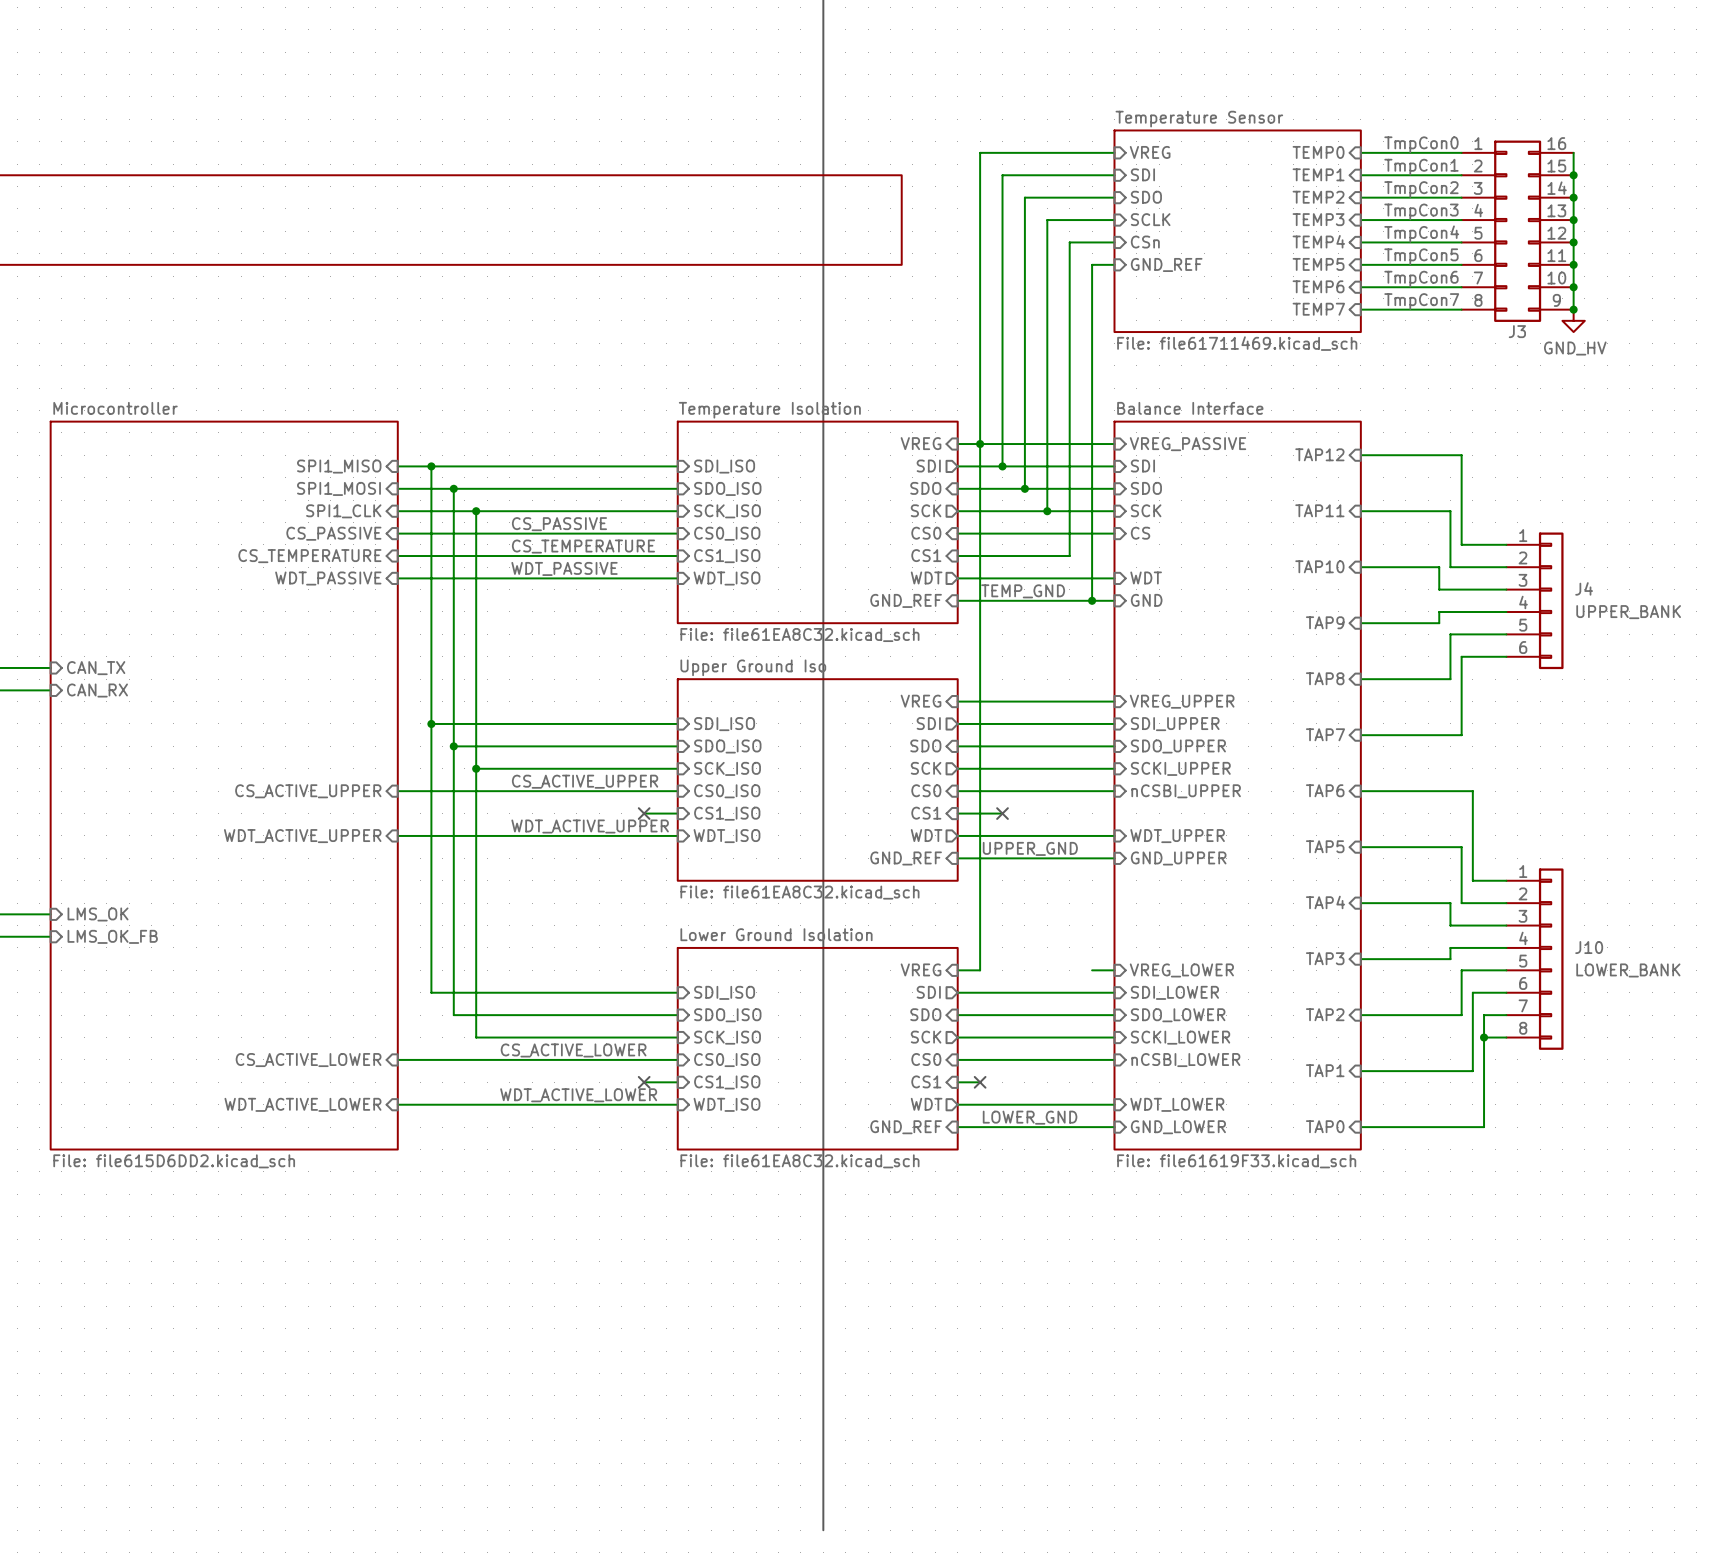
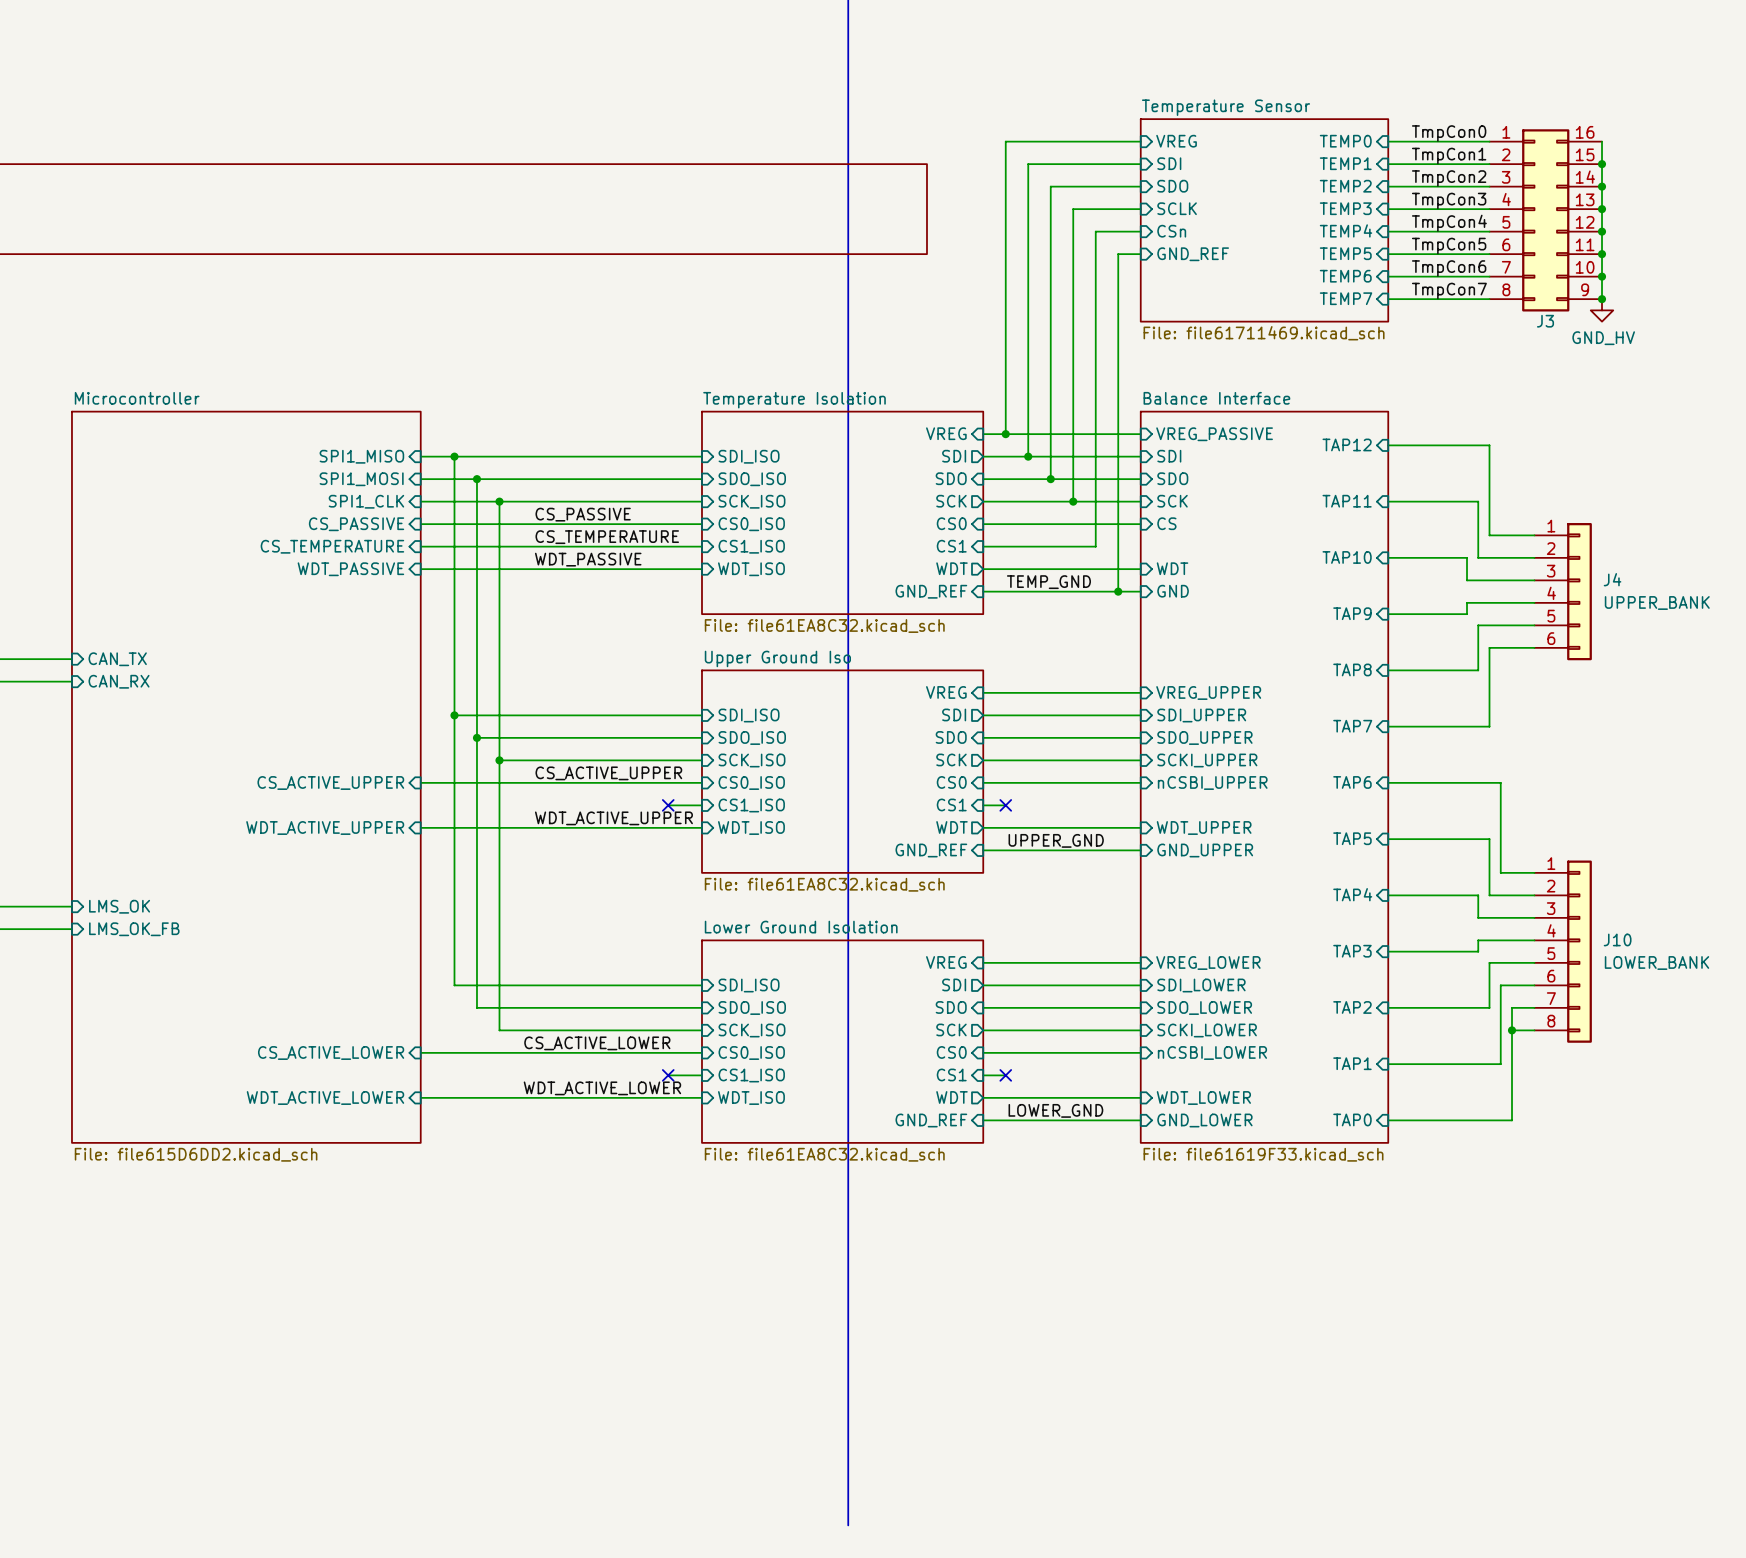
wire: (980, 444) (980, 970) -> (1118, 962) (1005, 962)
wire: (980, 813) (1002, 813) -> none
no-connect mark position: (1002, 813) -> (1005, 805)

